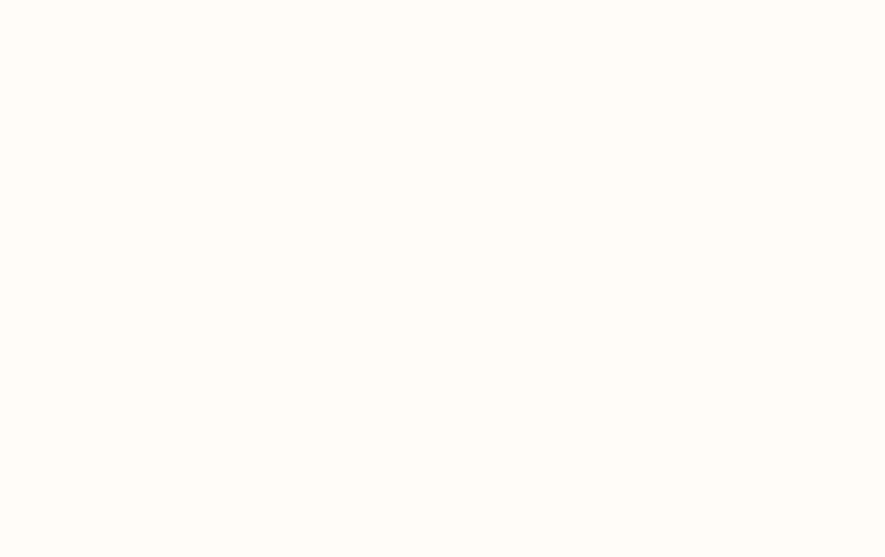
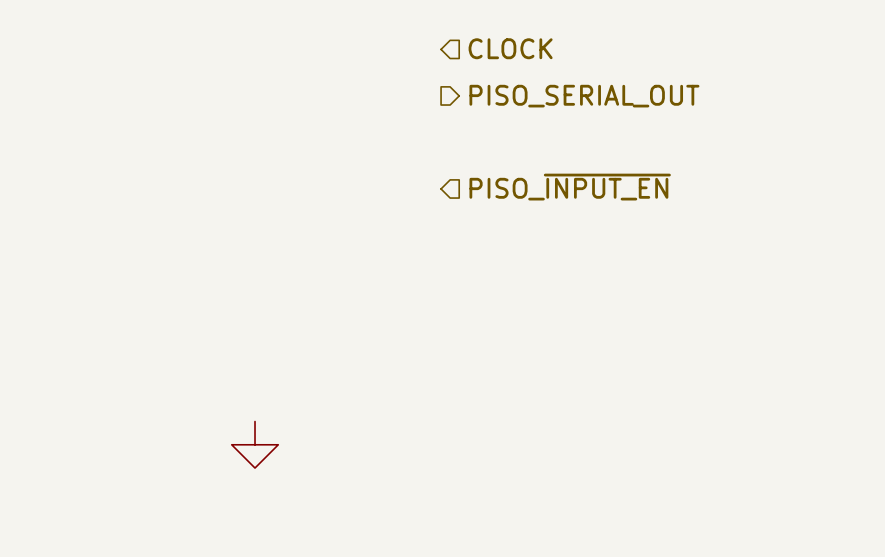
hierarchical label: none -> CLOCK (510, 48)
hierarchical label: none -> PISO_SERIAL_OUT (584, 96)
hierarchical label: none -> PISO_~{INPUT_EN} (570, 187)
power symbol: none -> (255, 444)

